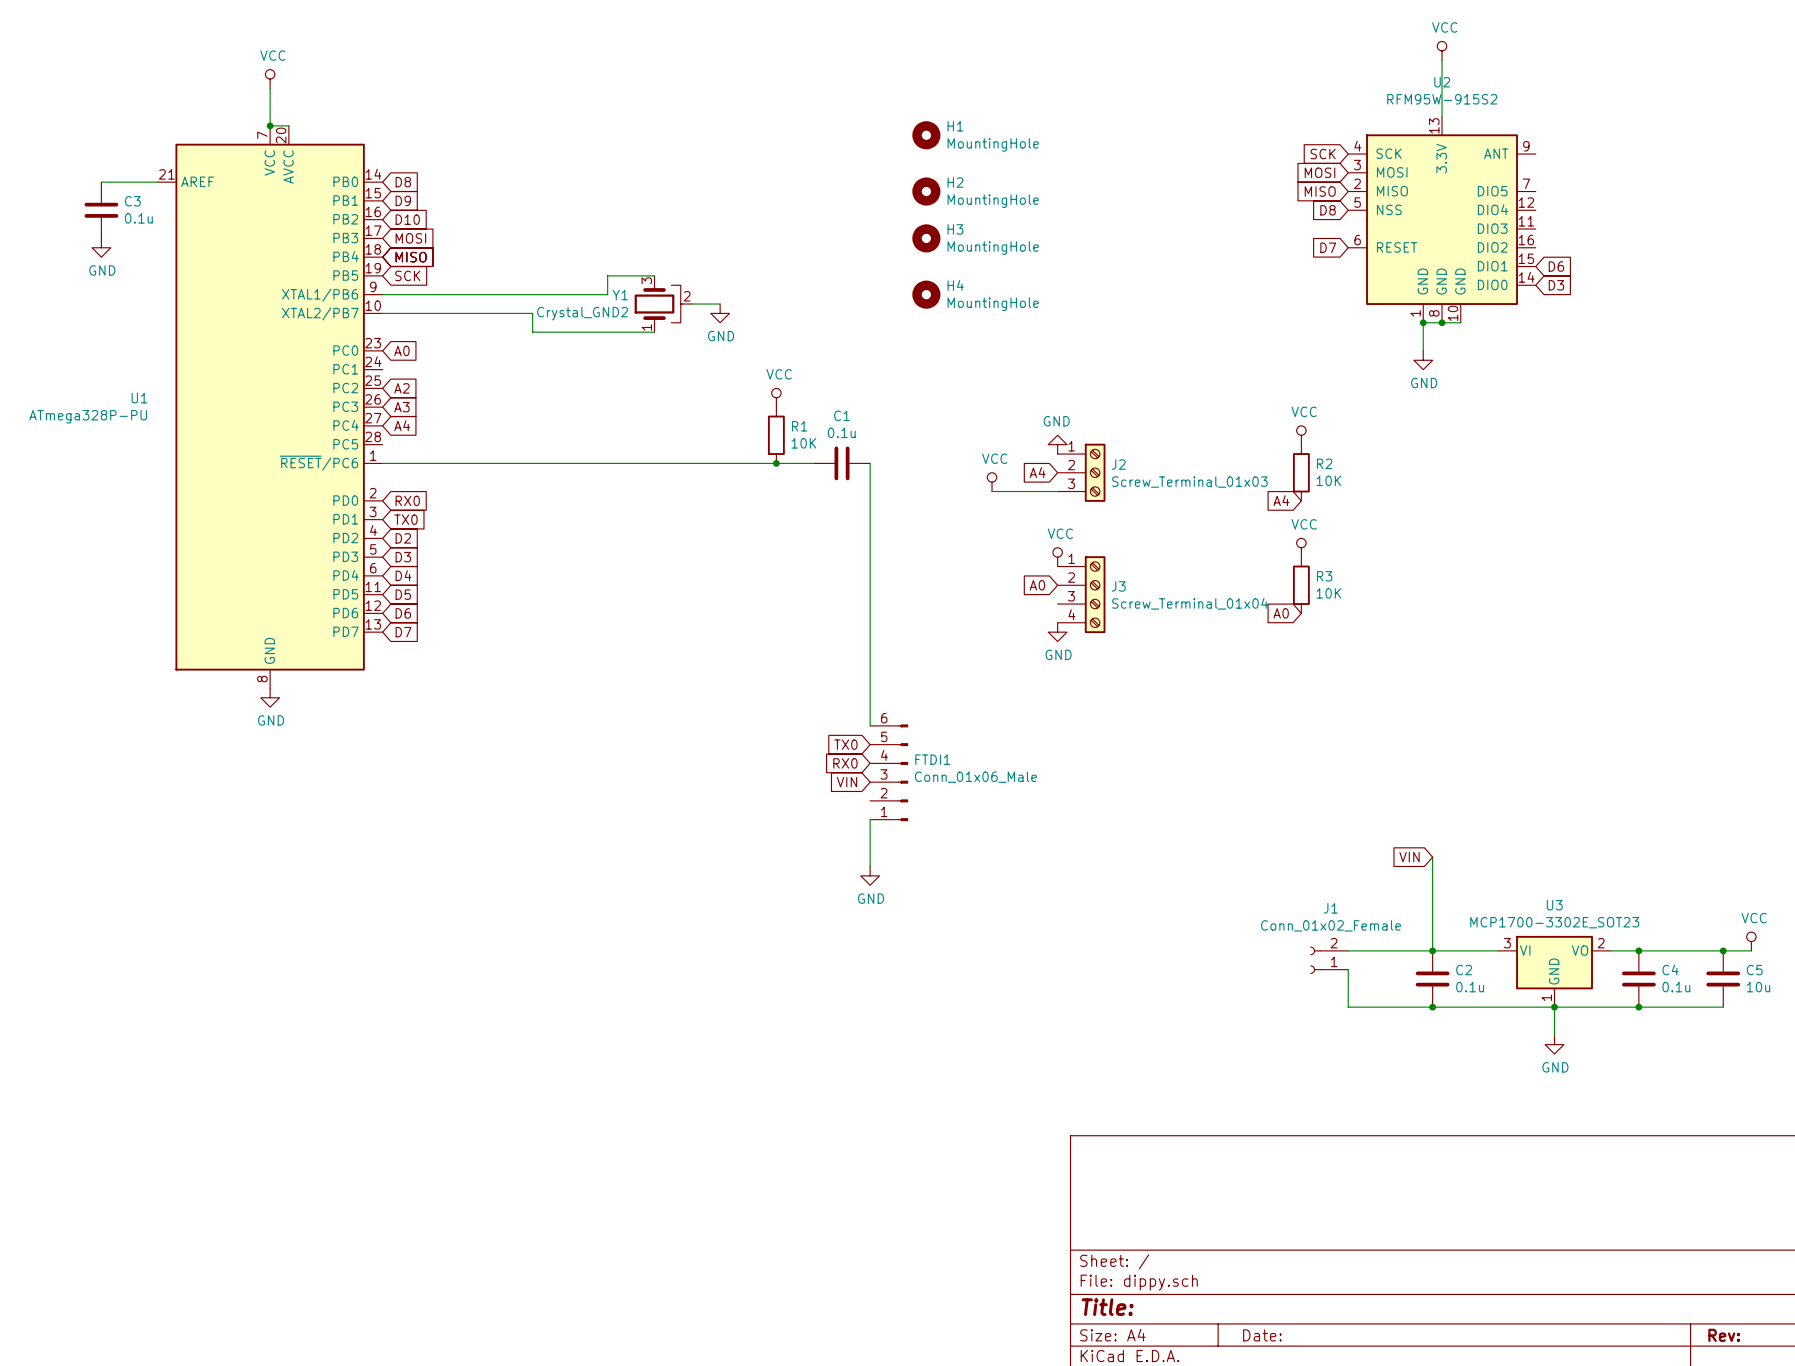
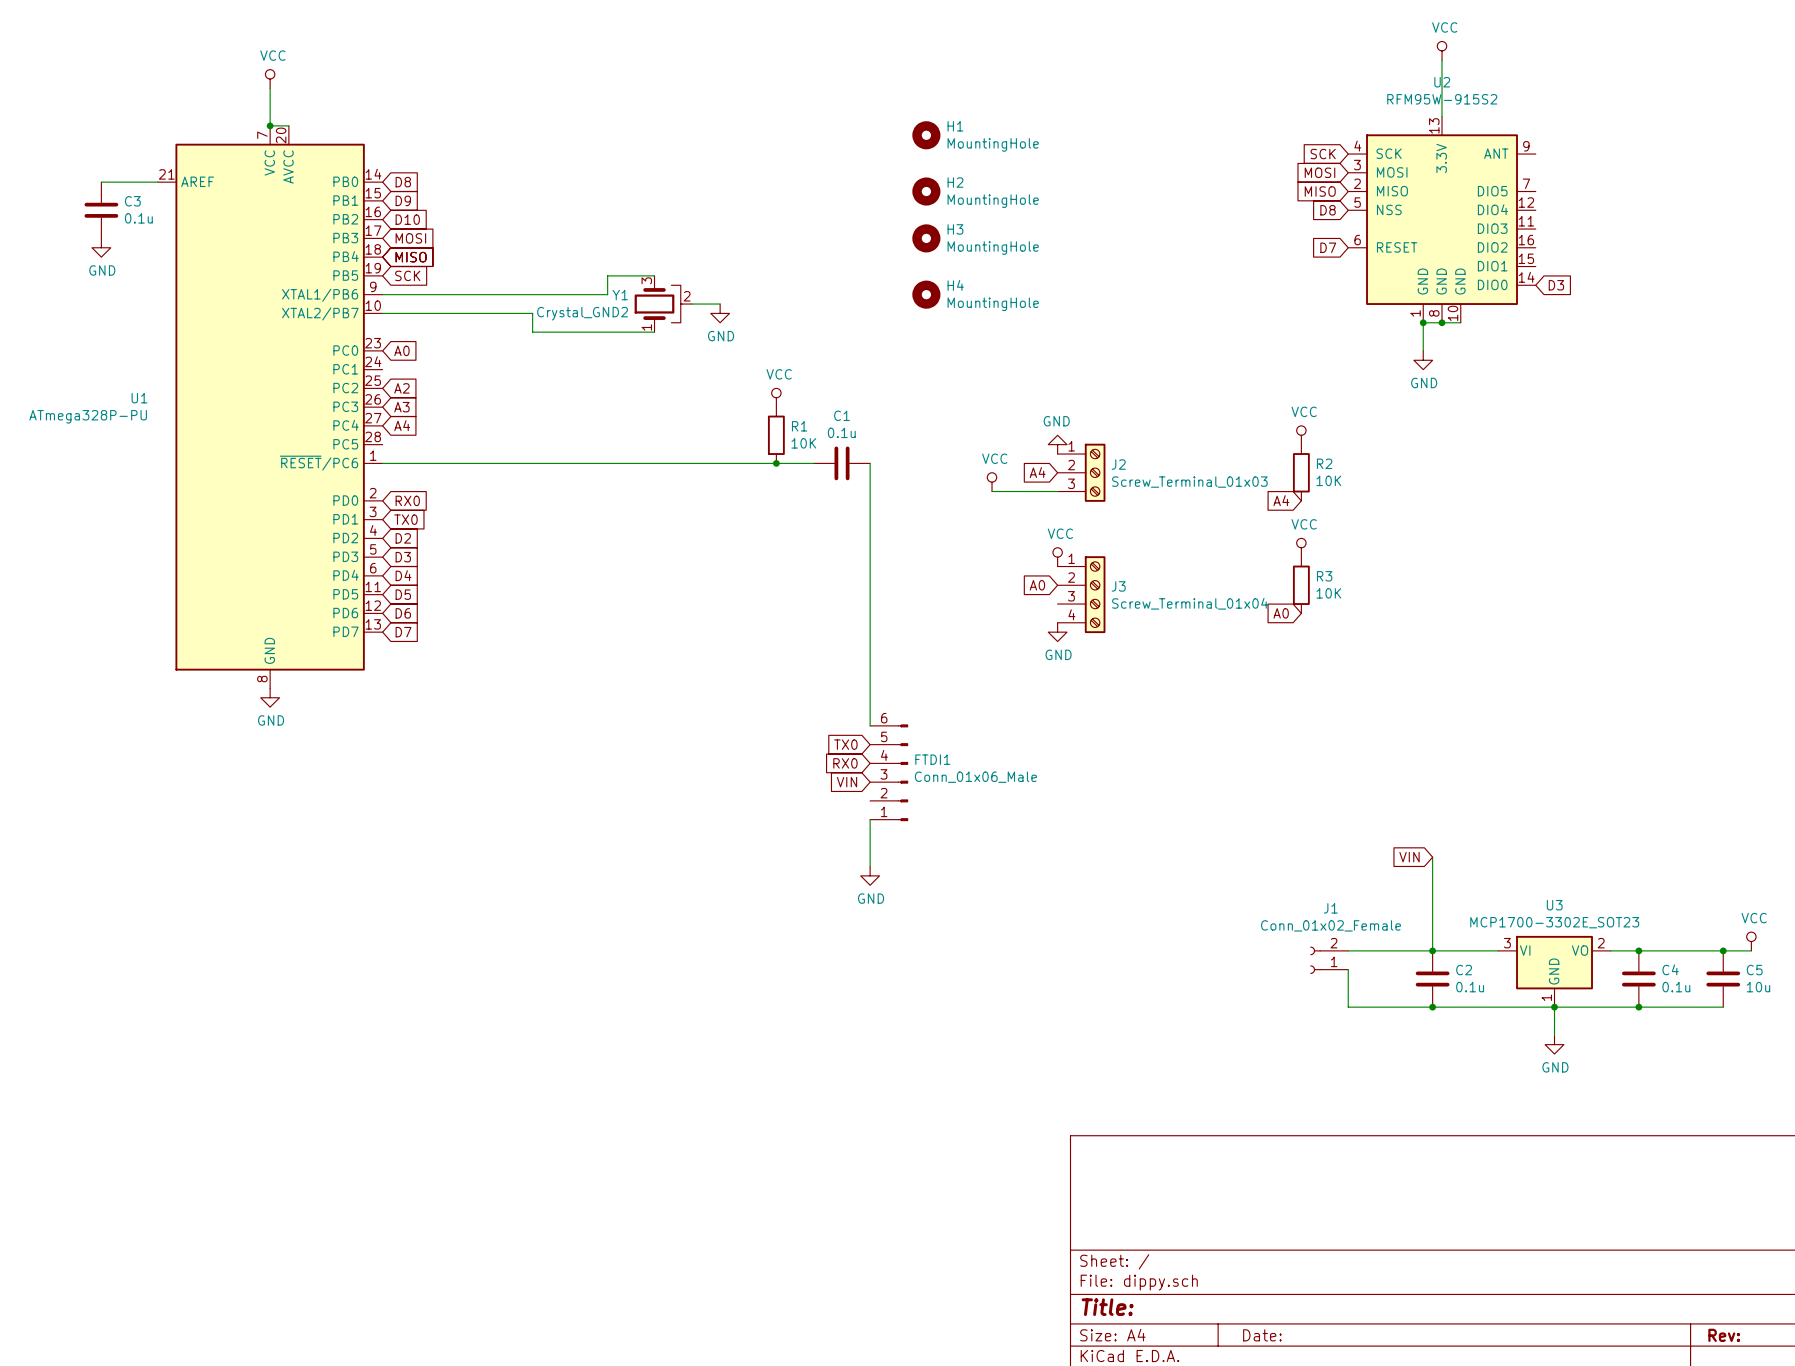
global label: D6 (1556, 266) -> none

